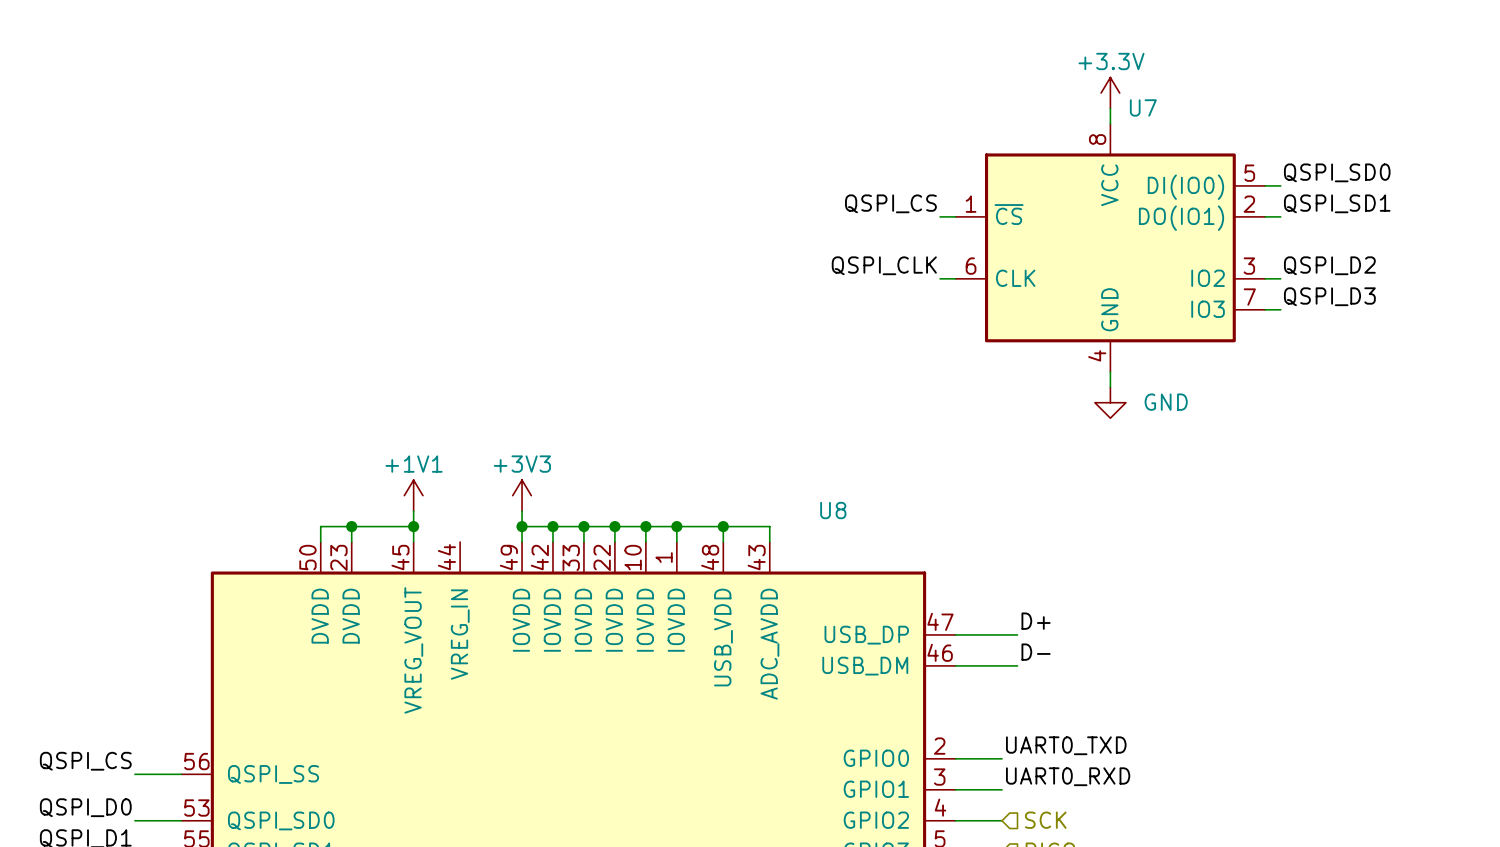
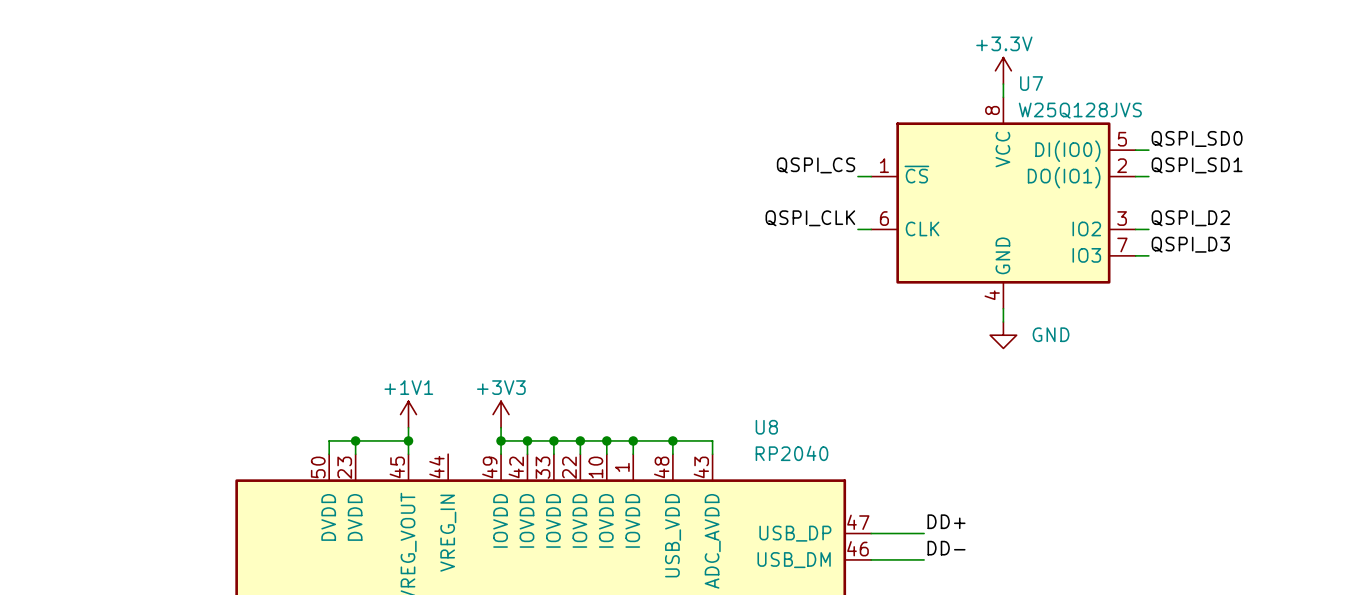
U7 value: none -> W25Q128JVS (1080, 110)
U8 value: none -> RP2040 (791, 453)
label: D+ (1036, 621) -> DD+ (946, 521)
label: D- (1036, 652) -> DD- (946, 548)

